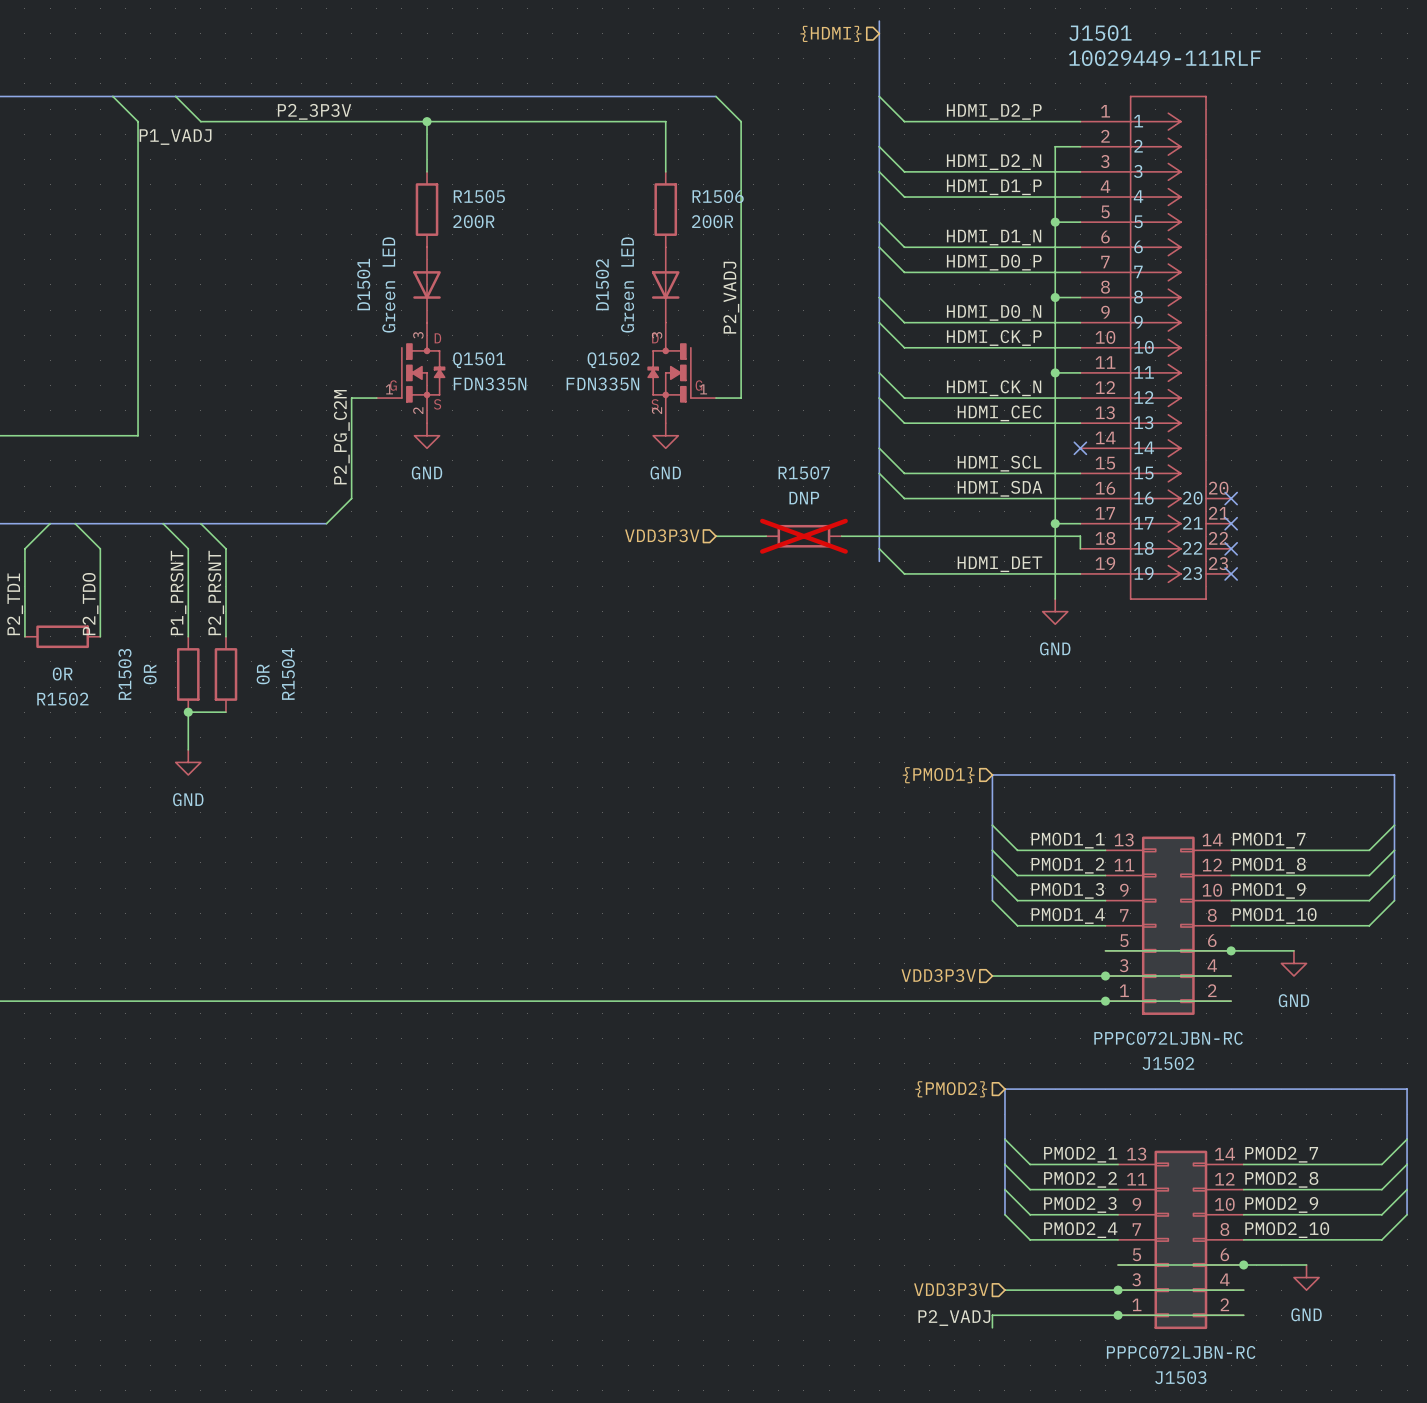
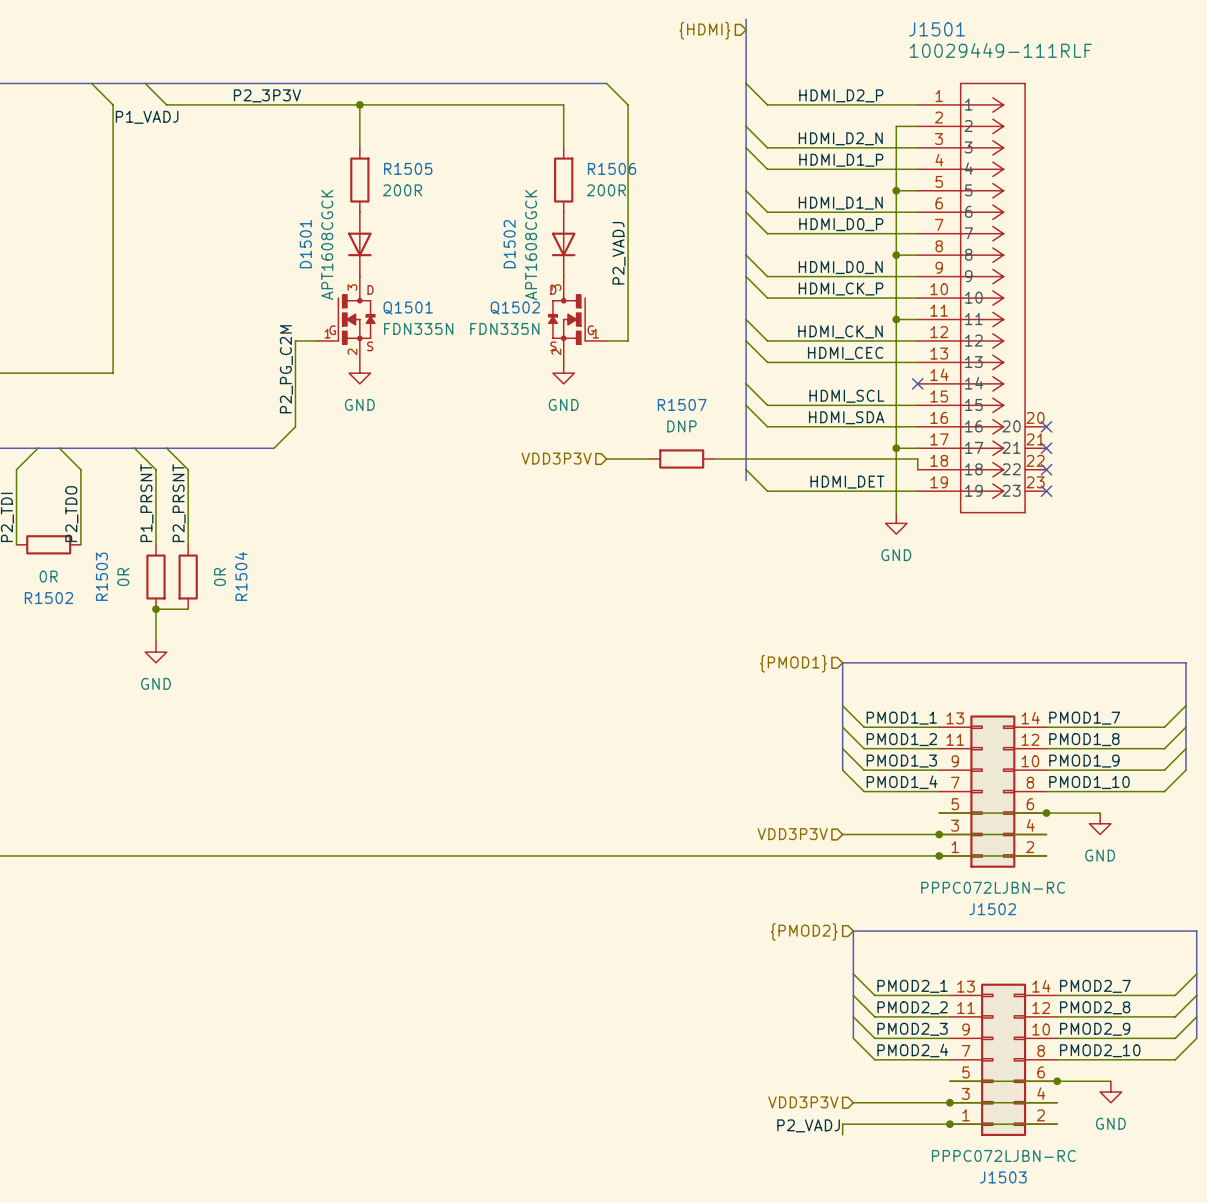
D1501 value: Green LED (388, 284) -> APT1608CGCK (327, 244)
D1502 value: Green LED (627, 284) -> APT1608CGCK (531, 244)
R1507 do-not-place cross: (803, 536) -> none

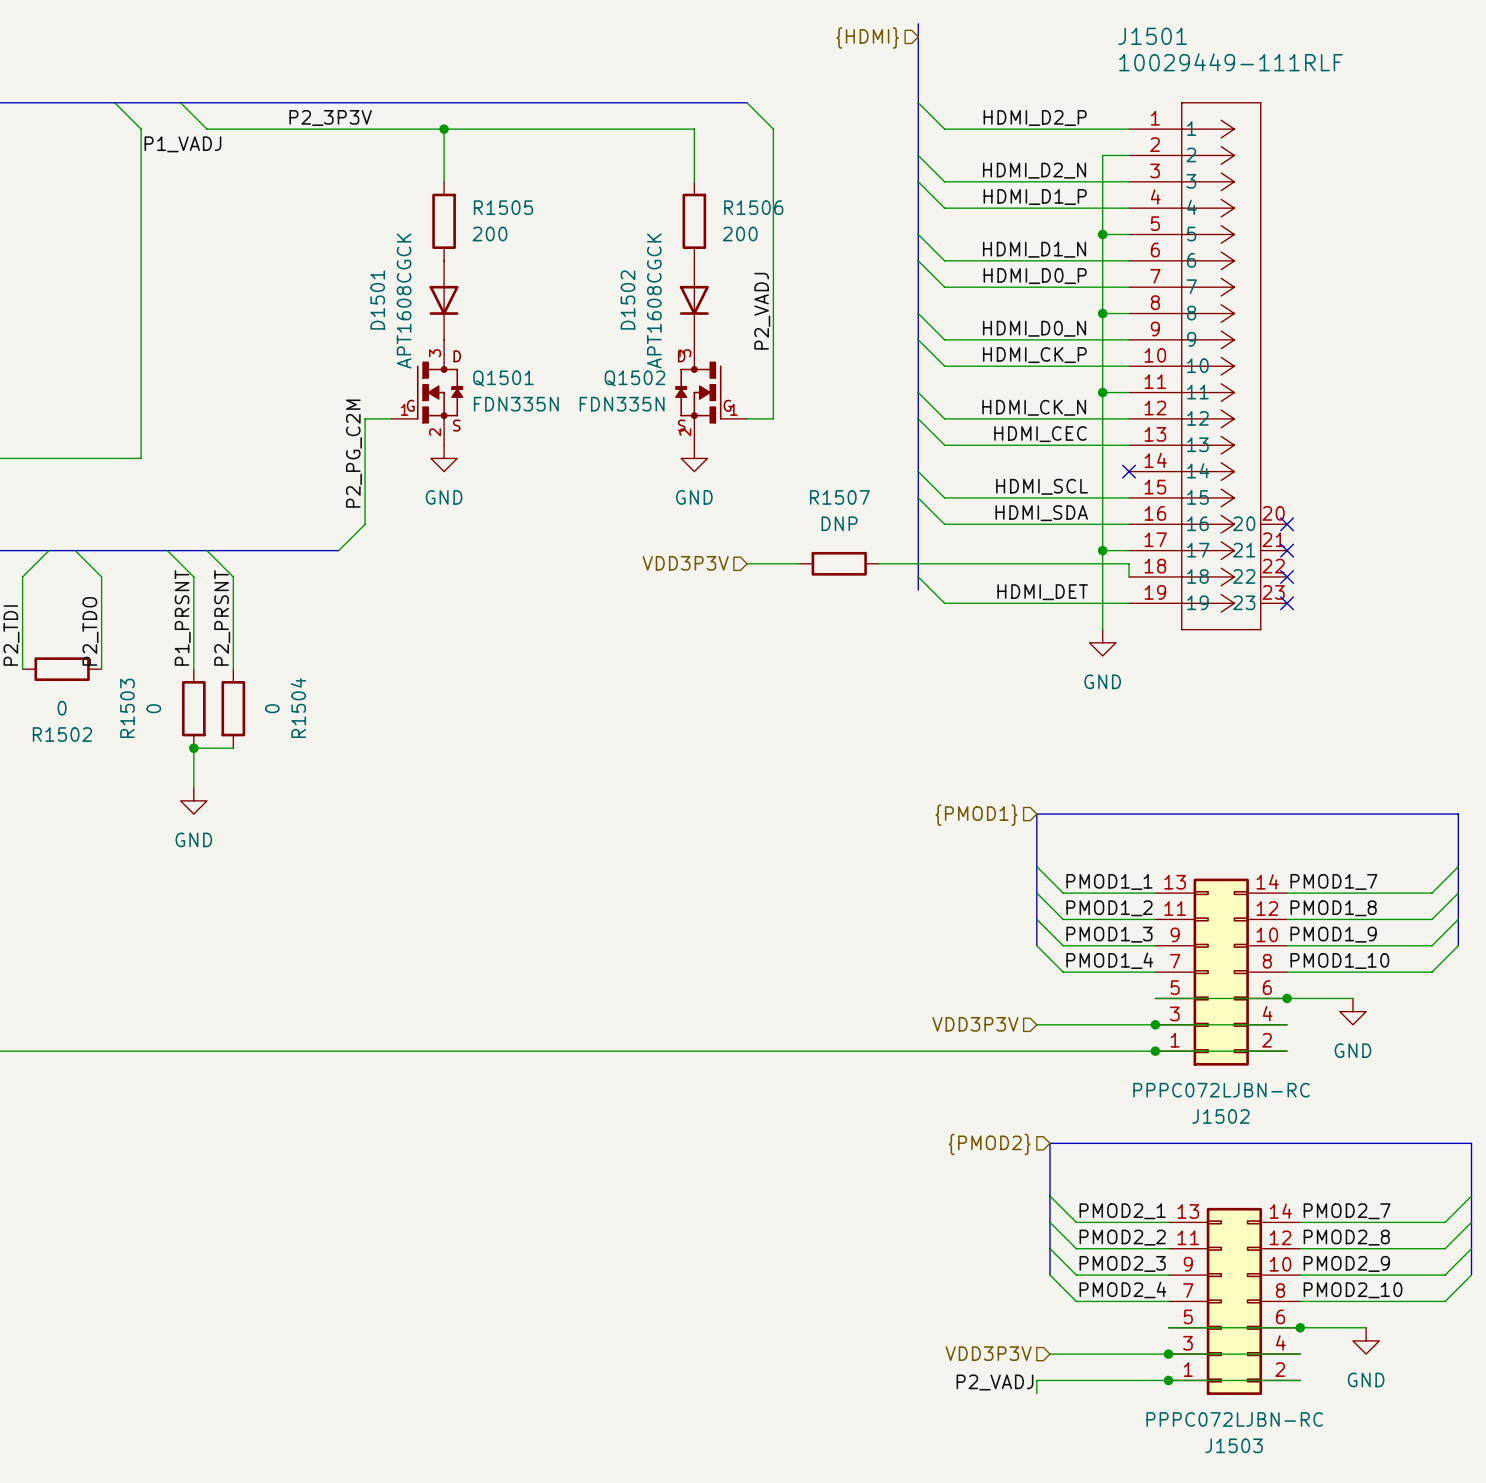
R1505 value: 200R (402, 190) -> 200 (489, 234)
R1506 value: 200R (606, 190) -> 200 (740, 234)
R1502 value: 0R (48, 576) -> 0 (62, 708)
R1503 value: 0R (123, 577) -> 0 (153, 708)
R1504 value: 0R (219, 577) -> 0 (272, 708)

